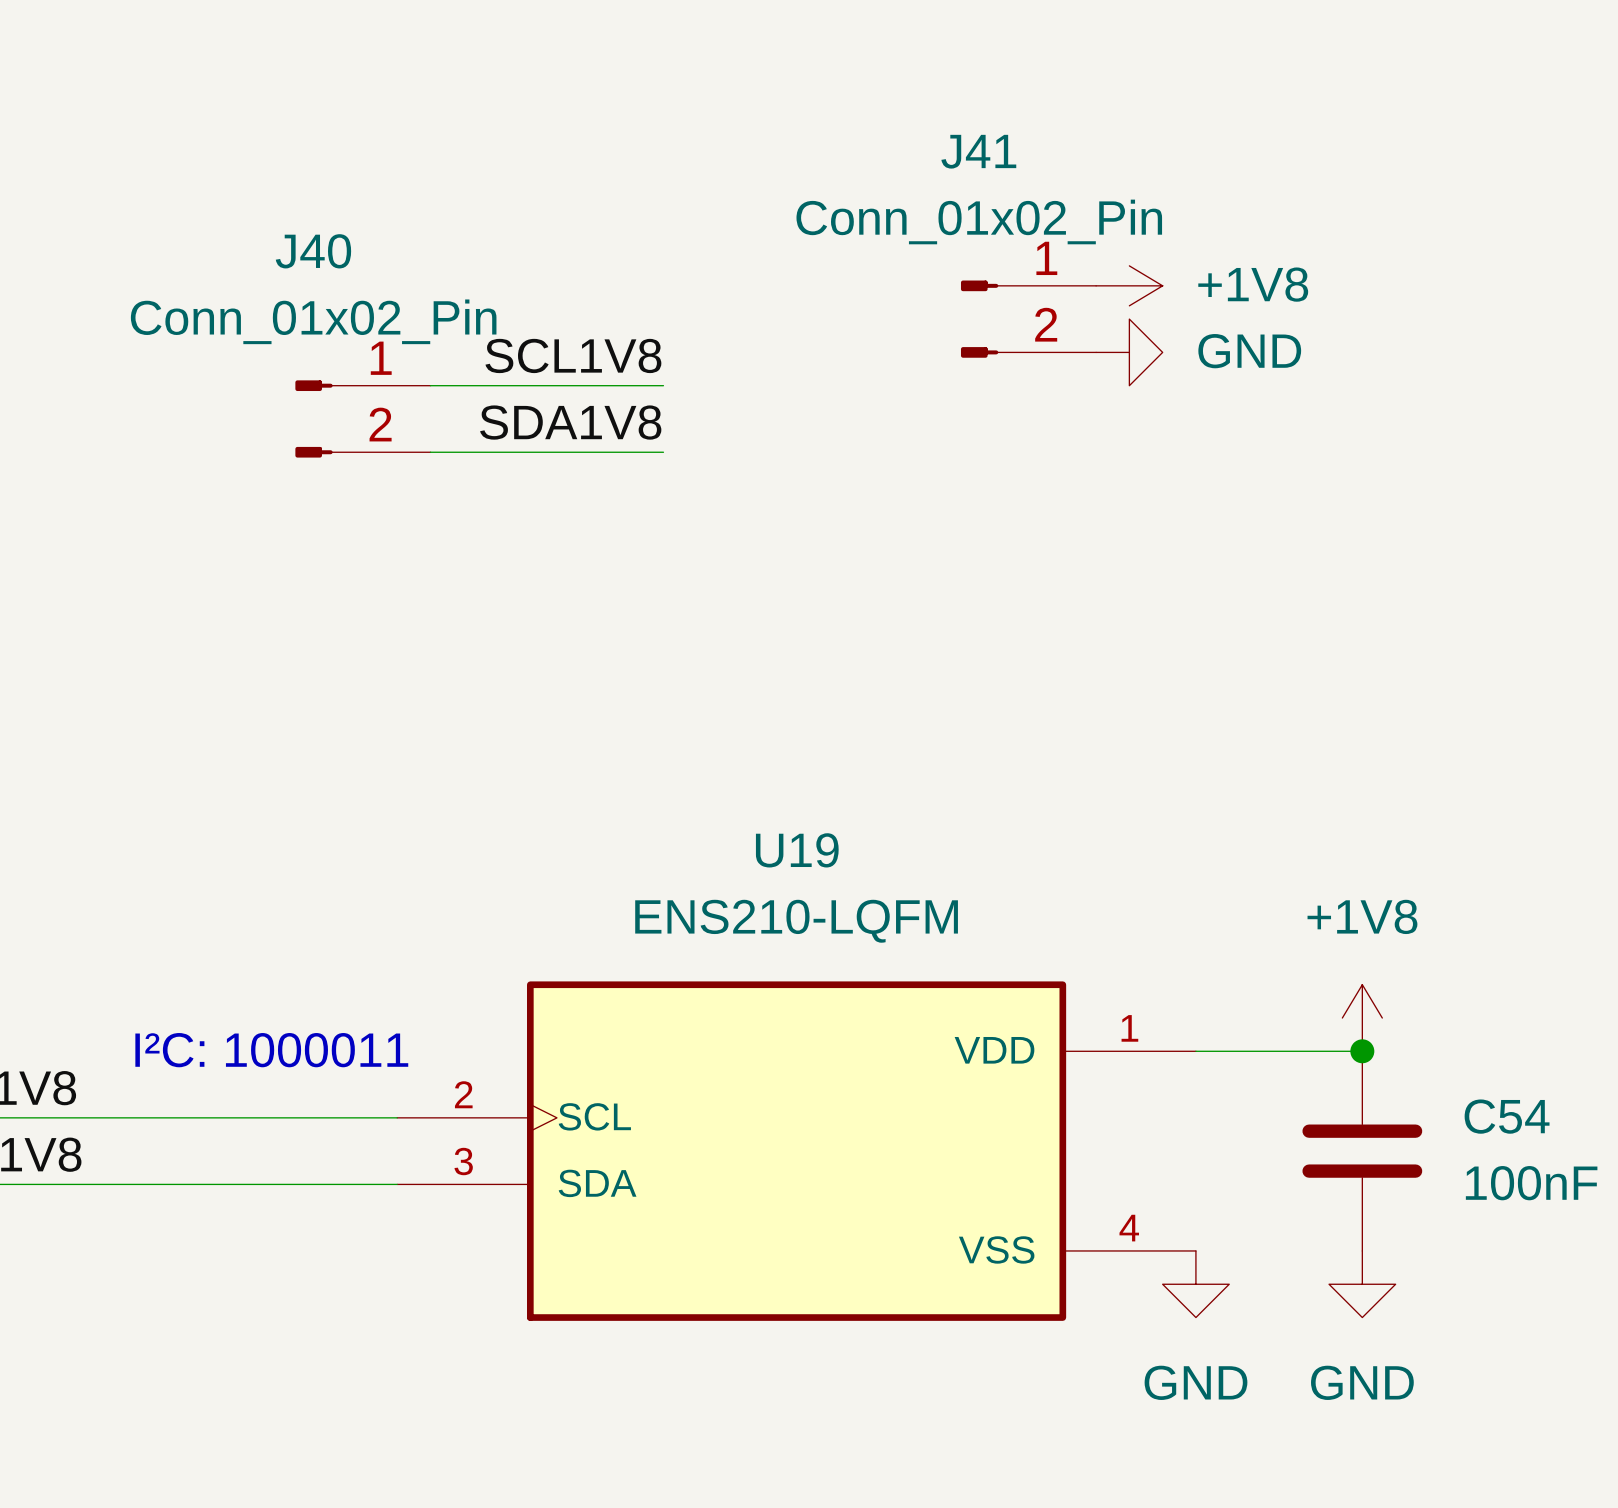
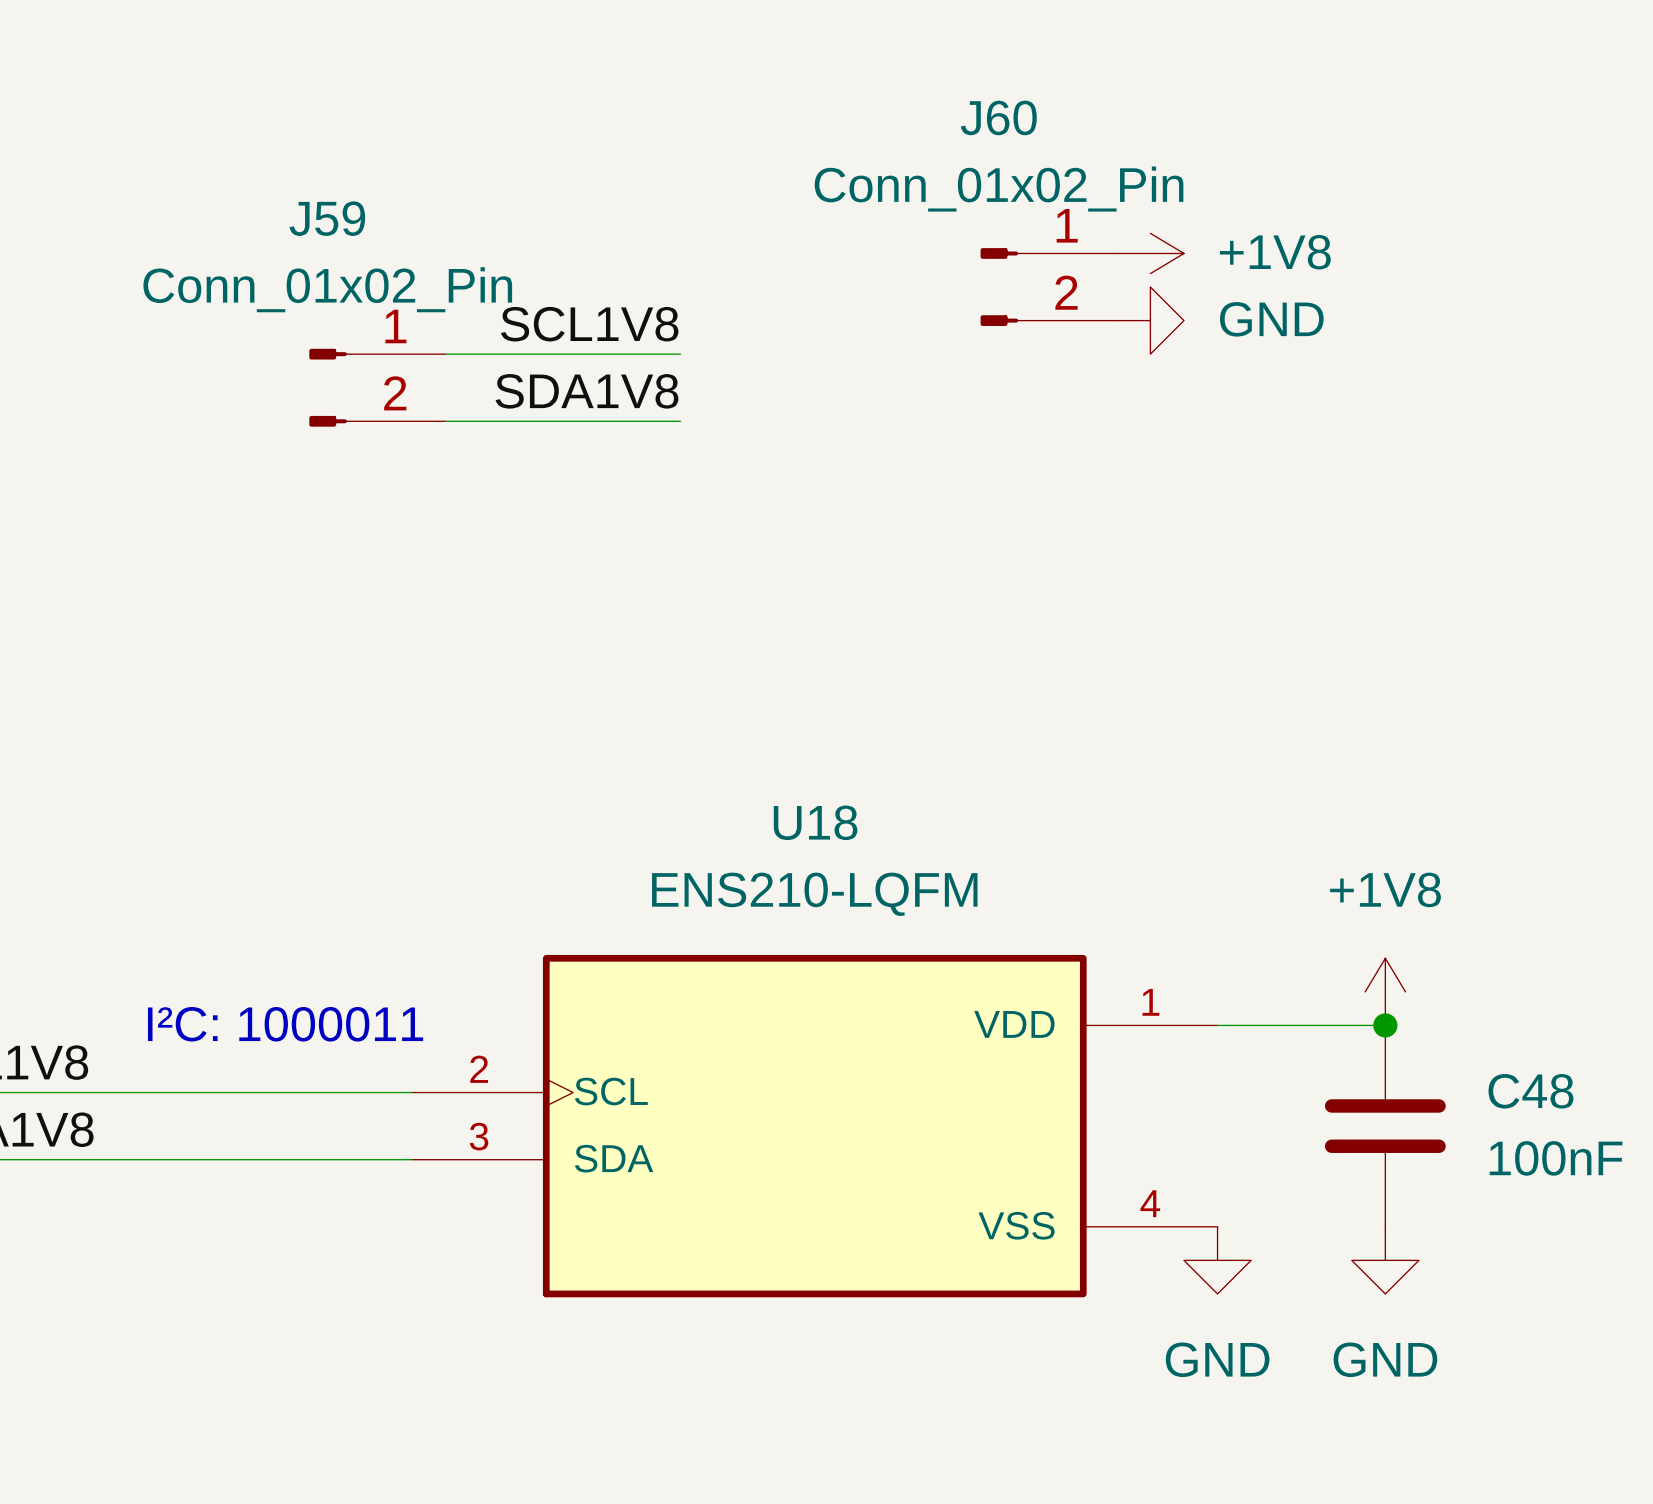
J41 name: J41 (978, 151) -> J60 (998, 117)
J40 name: J40 (313, 251) -> J59 (327, 218)
U19 name: U19 (797, 850) -> U18 (815, 822)
C54 name: C54 (1507, 1116) -> C48 (1530, 1091)

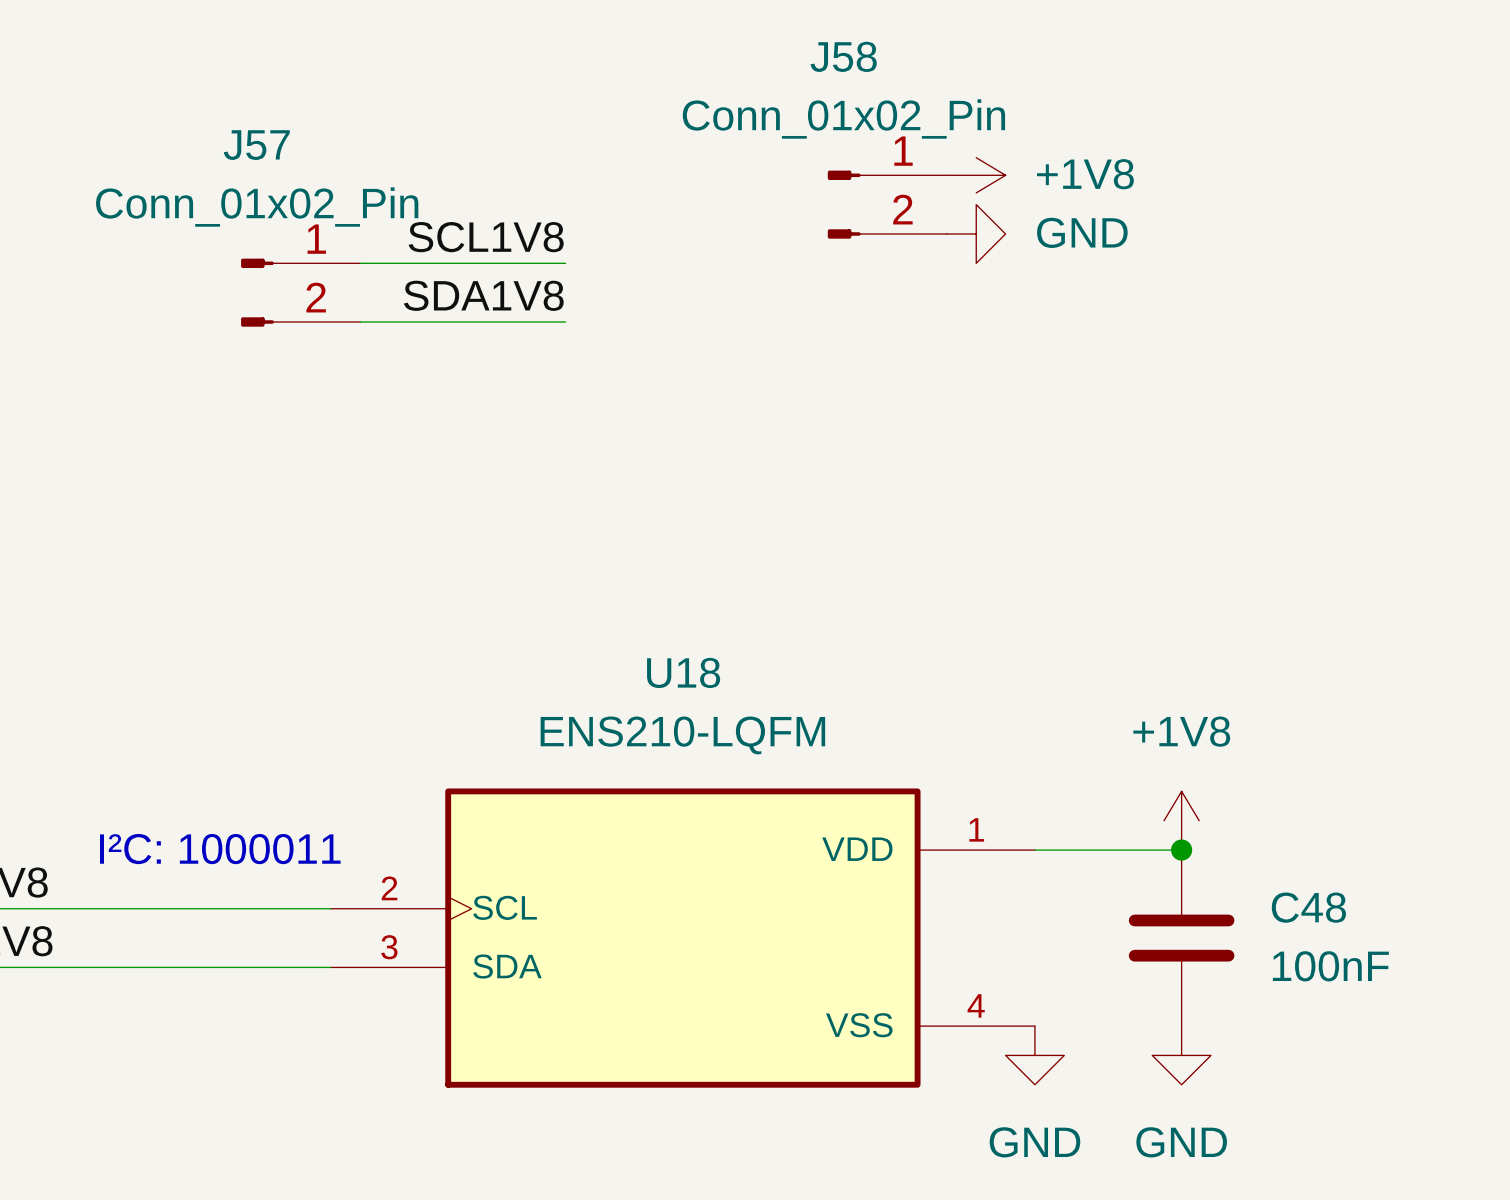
J60 name: J60 (998, 117) -> J58 (843, 56)
J59 name: J59 (327, 218) -> J57 (256, 145)

